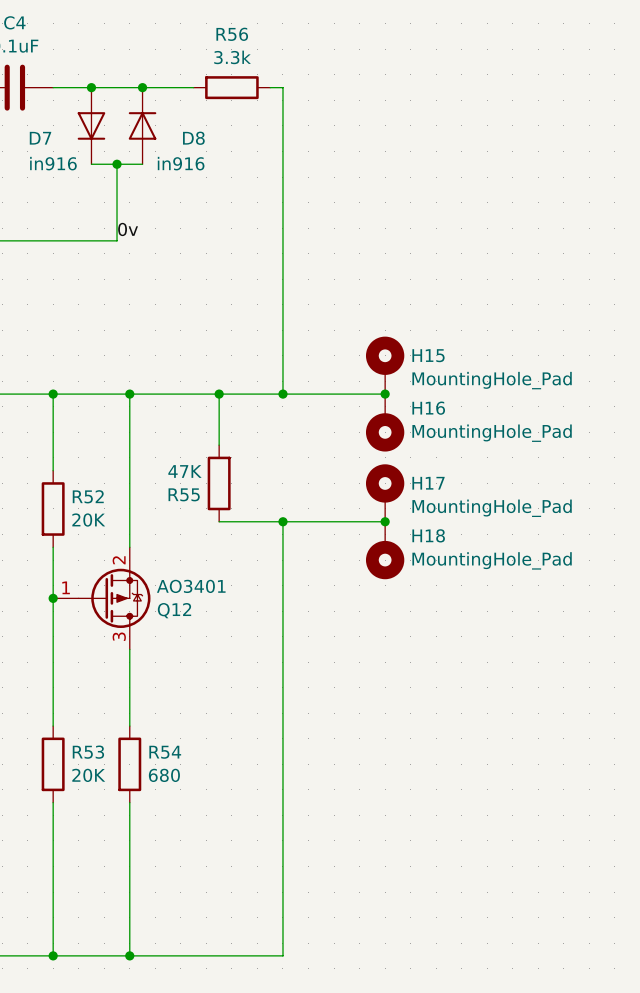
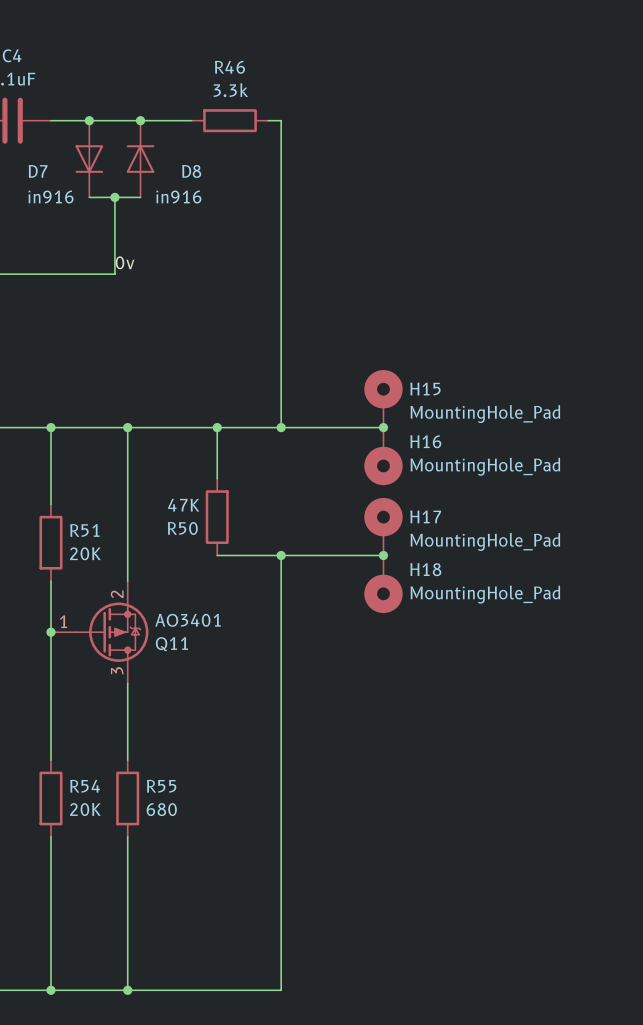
R56 name: R56 (232, 34) -> R46 (229, 67)
R55 name: R55 (184, 494) -> R50 (182, 528)
R52 name: R52 (88, 496) -> R51 (84, 530)
Q12 name: Q12 (174, 610) -> Q11 (171, 644)
R53 name: R53 (88, 752) -> R54 (85, 786)
R54 name: R54 (165, 752) -> R55 (161, 786)

